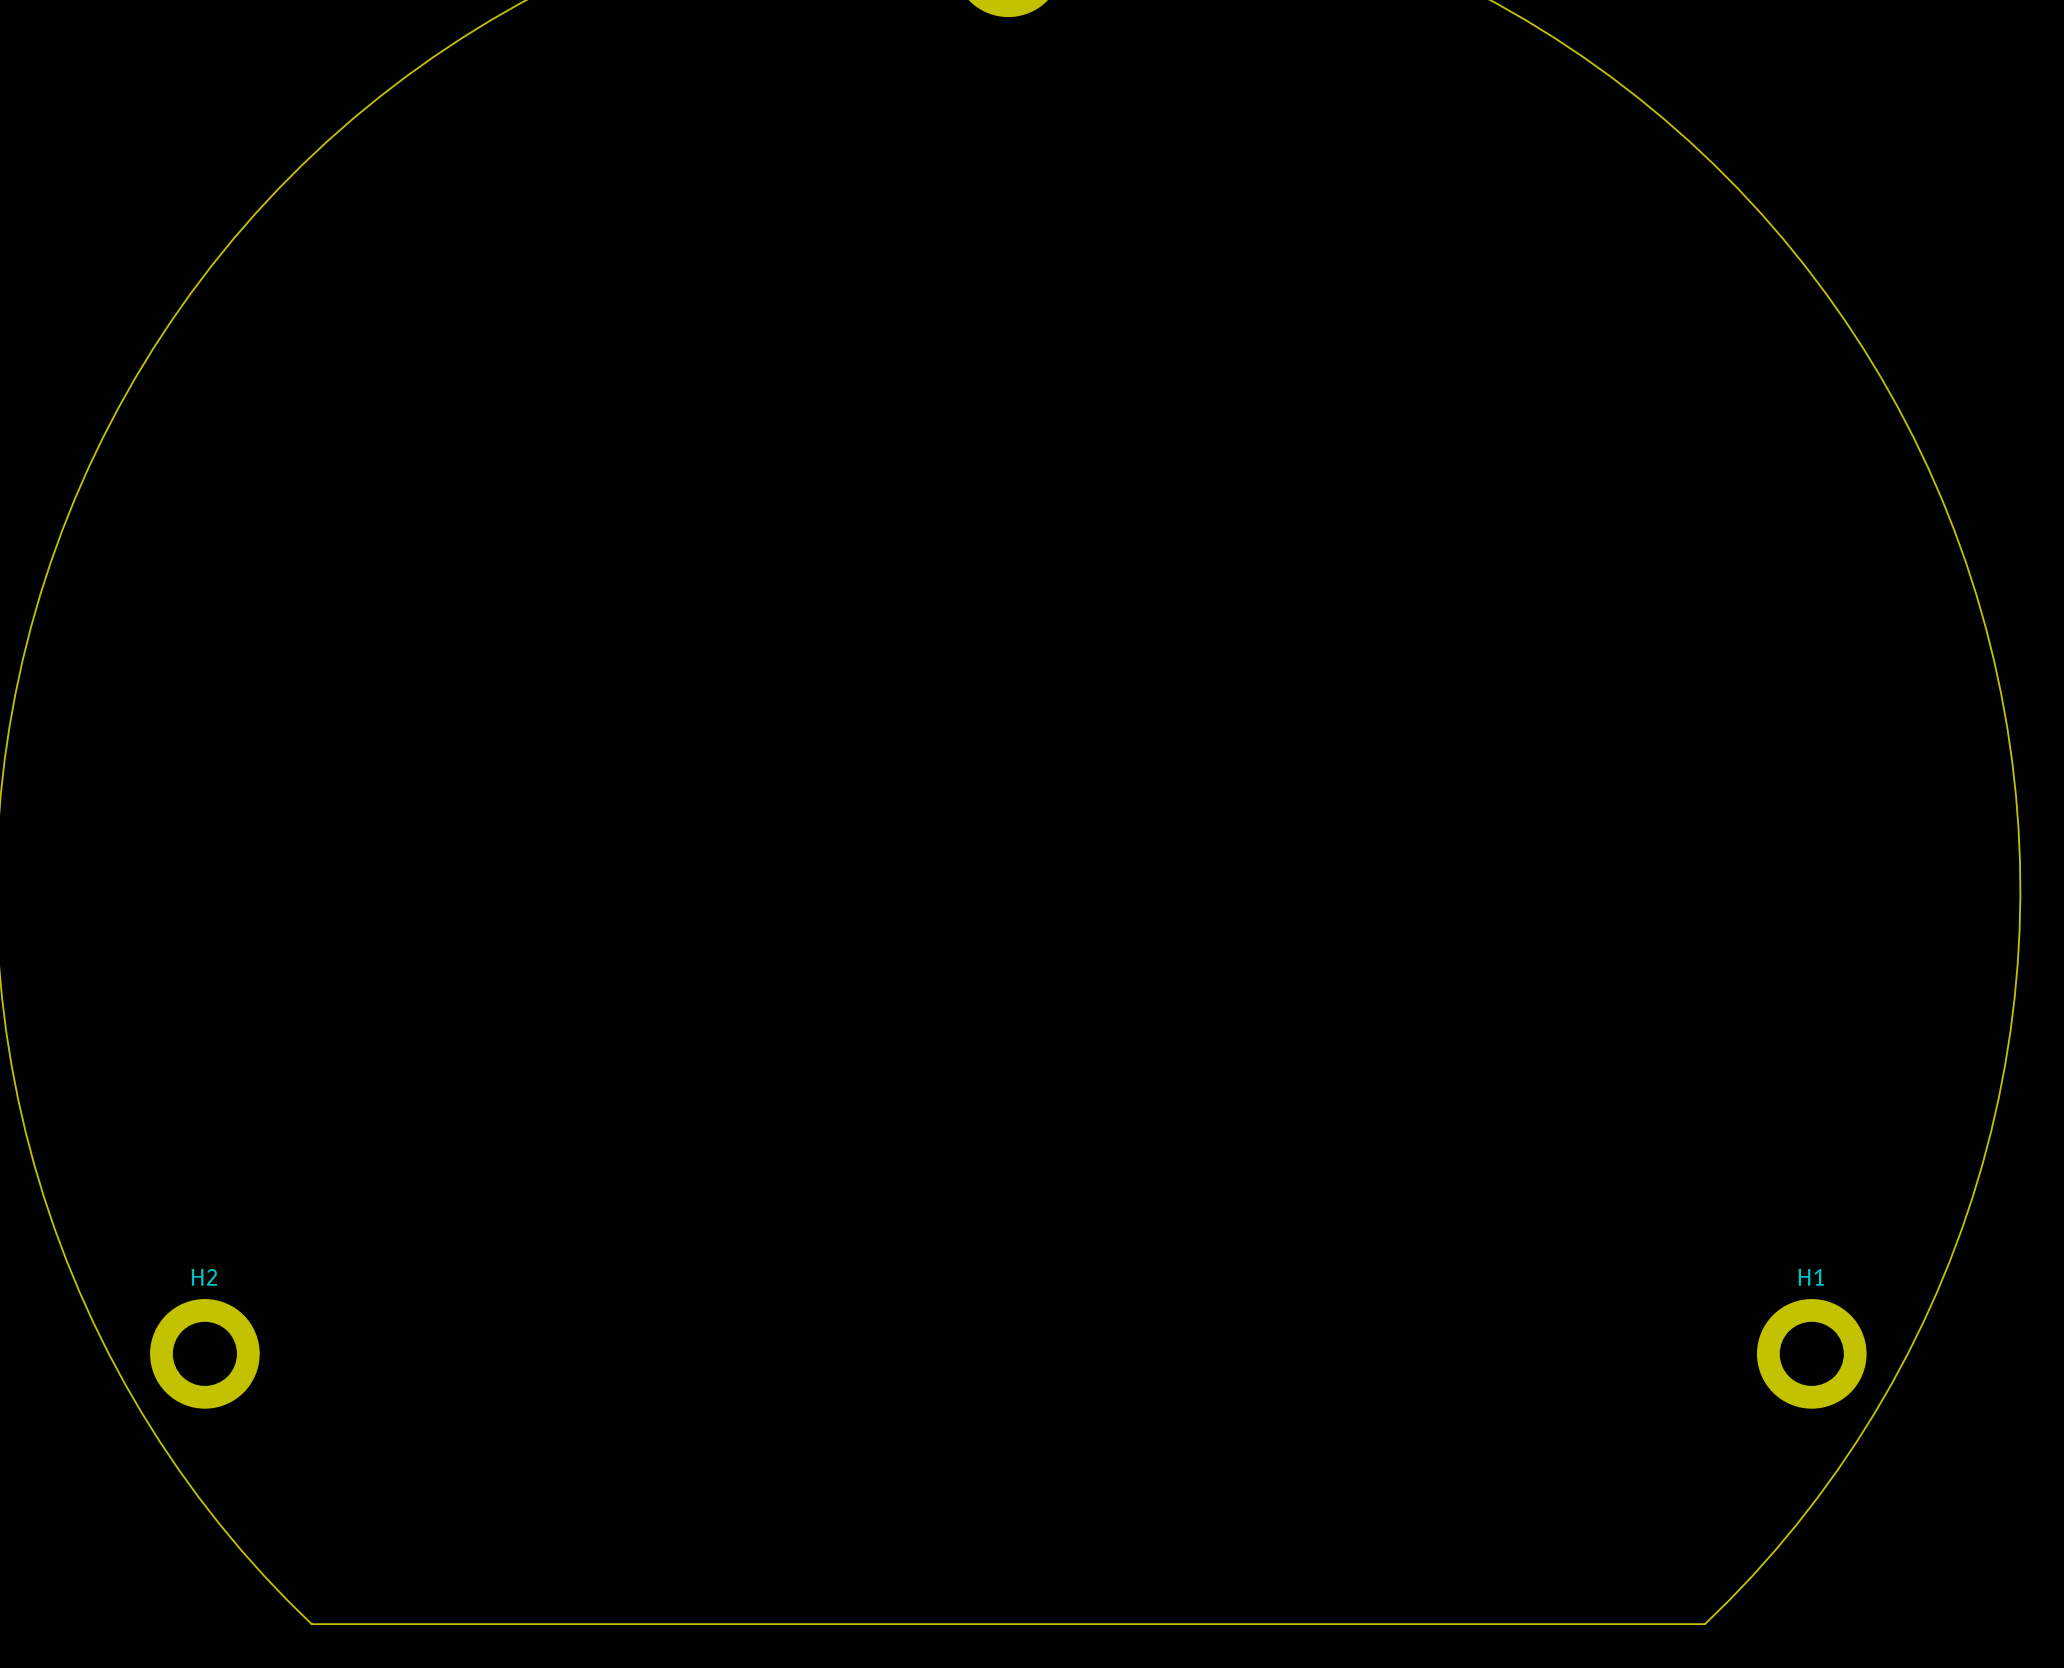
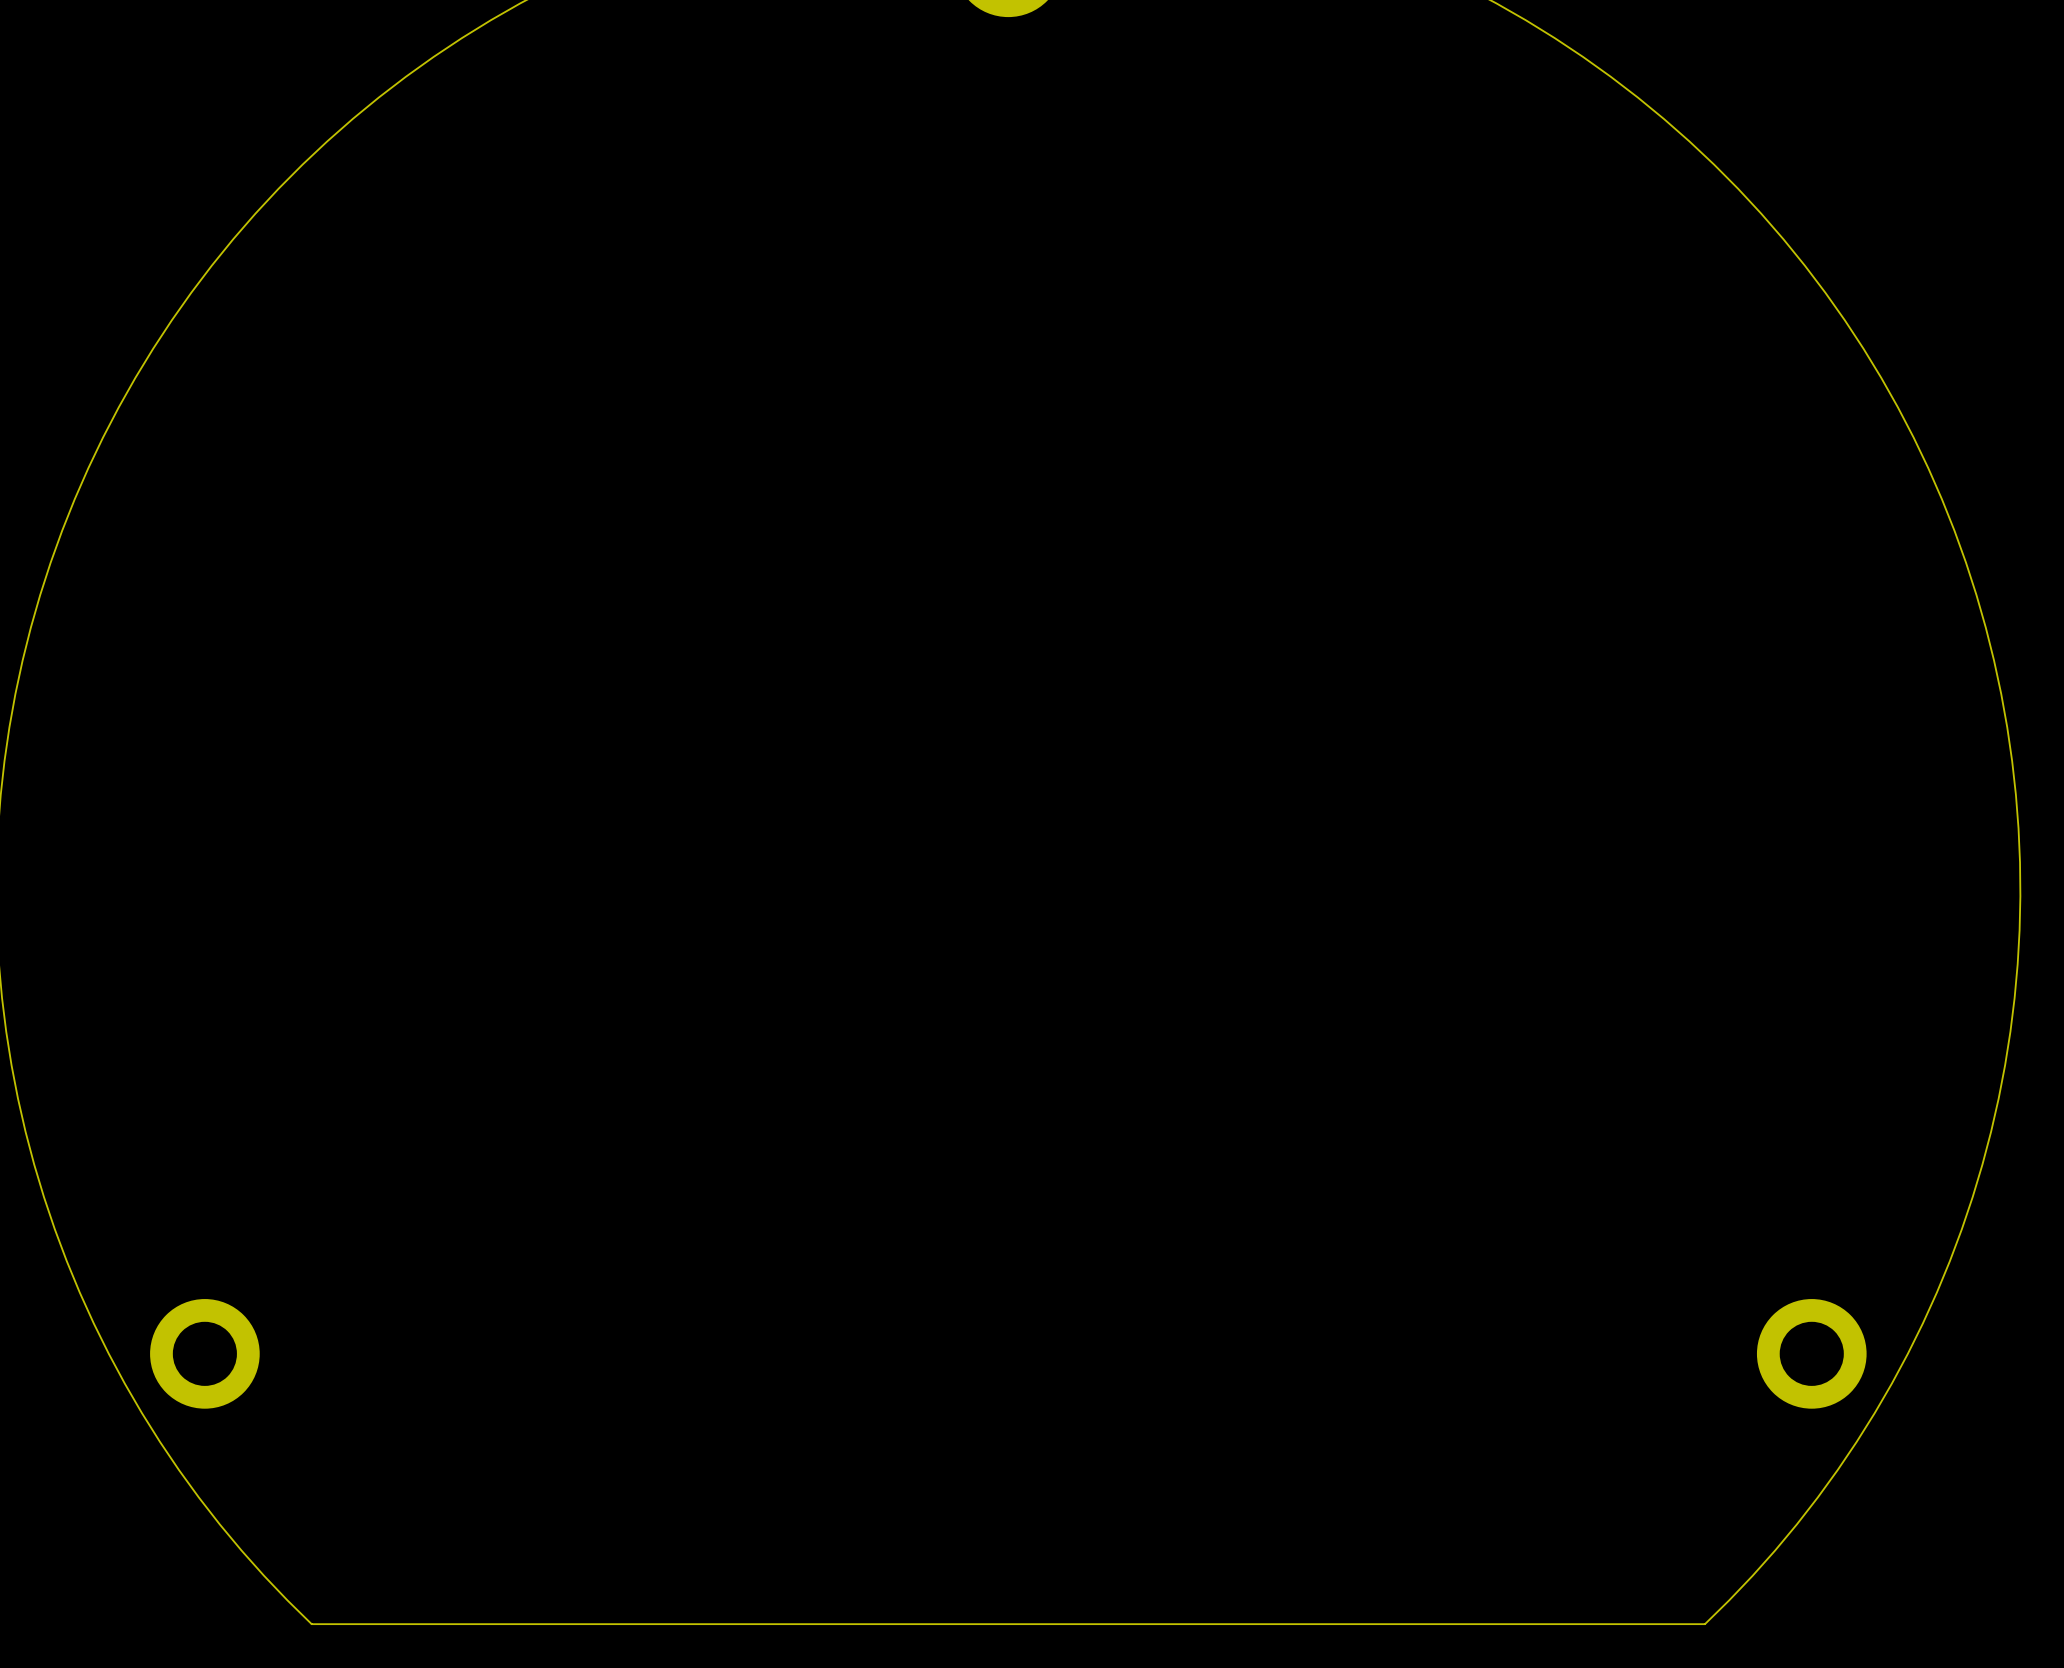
H2 name: H2 (204, 1277) -> none
H1 name: H1 (1811, 1277) -> none

